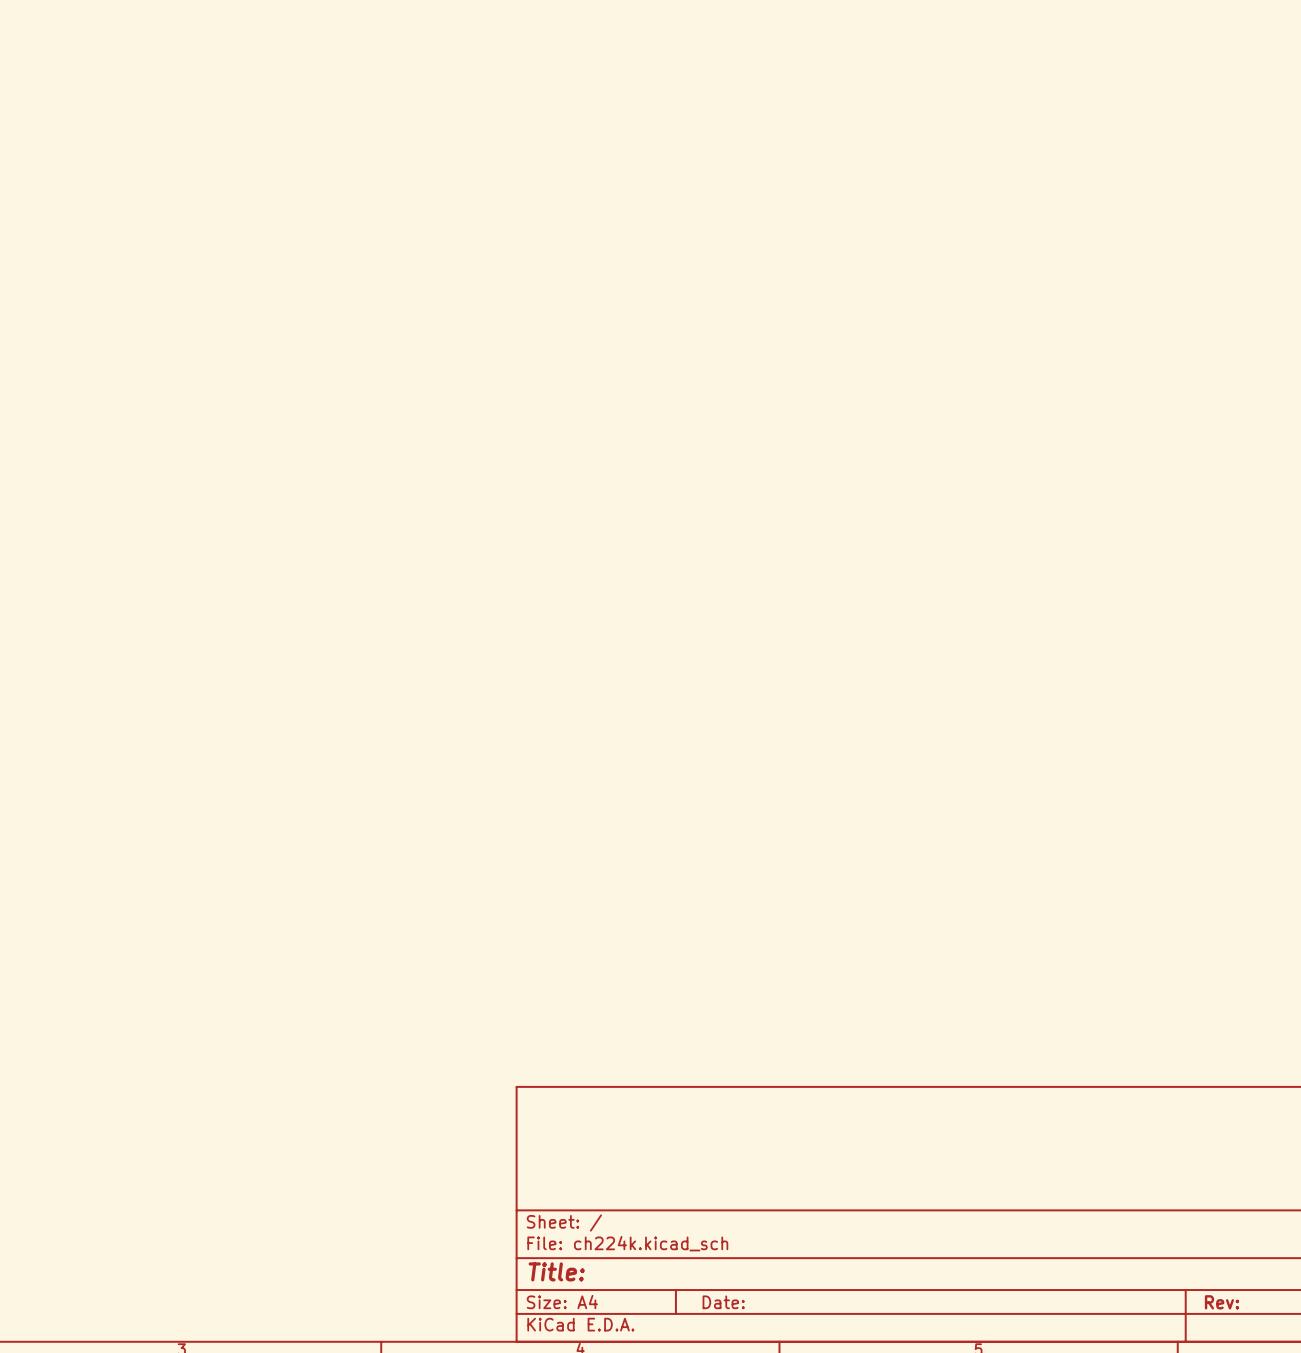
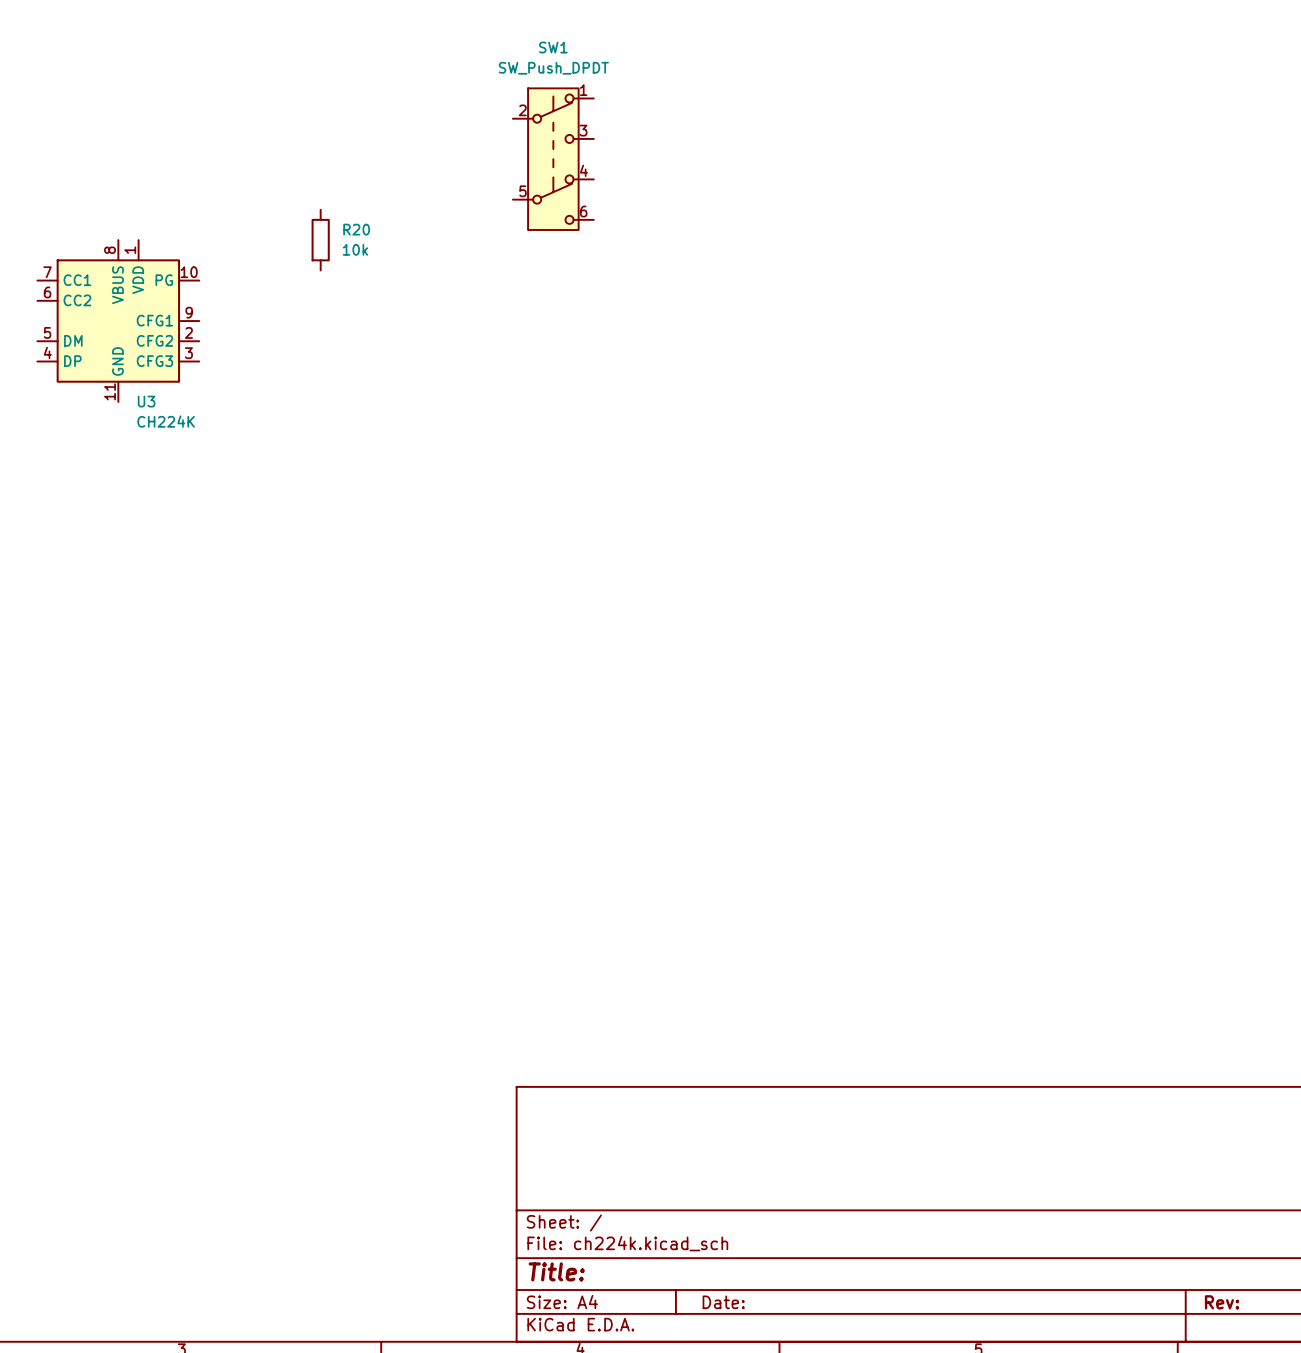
SW1: none -> SW_Push_DPDT (553, 159)
R20: none -> 10k (320, 240)
U3: none -> CH224K (118, 321)

